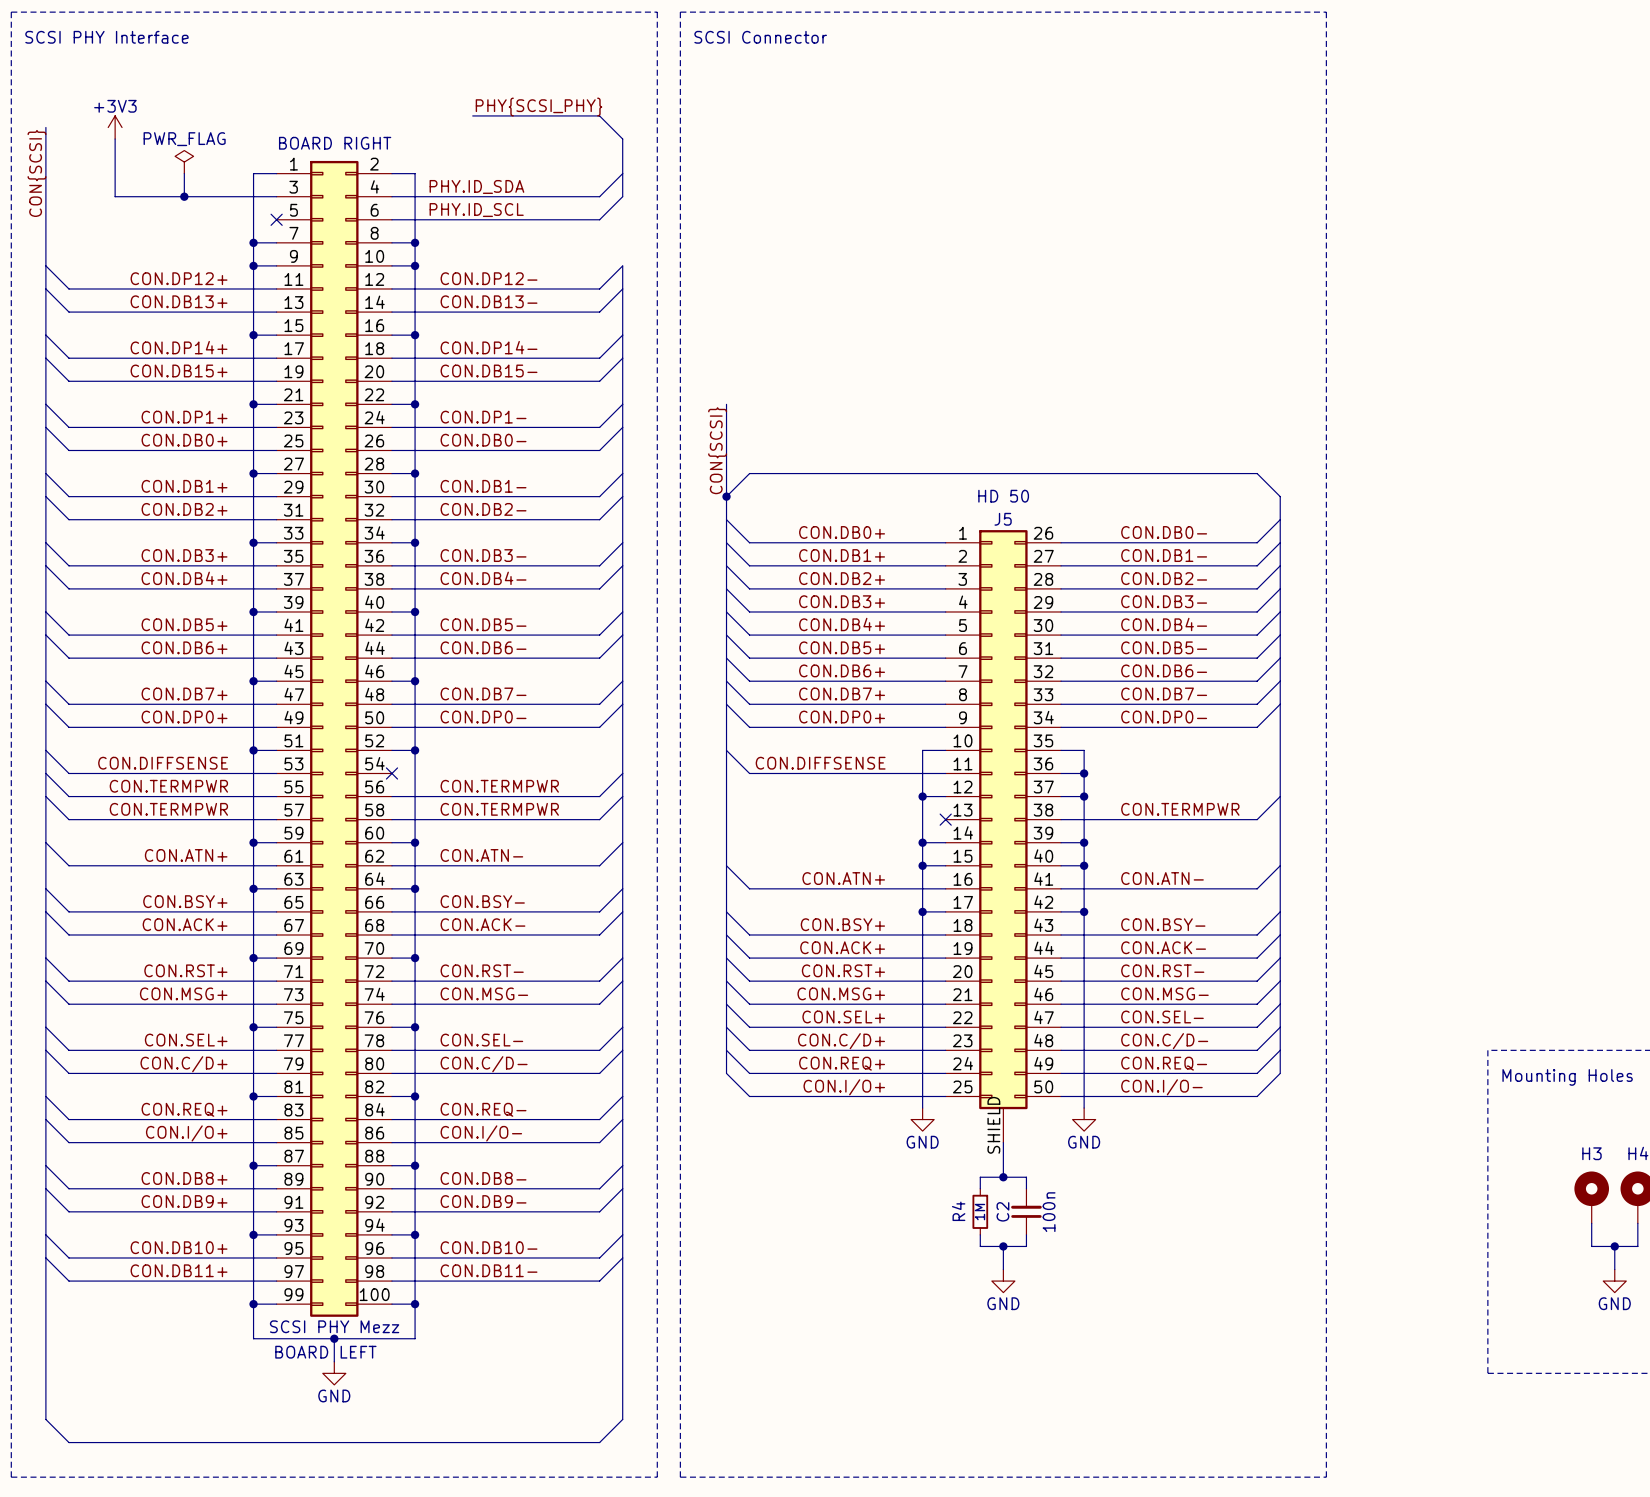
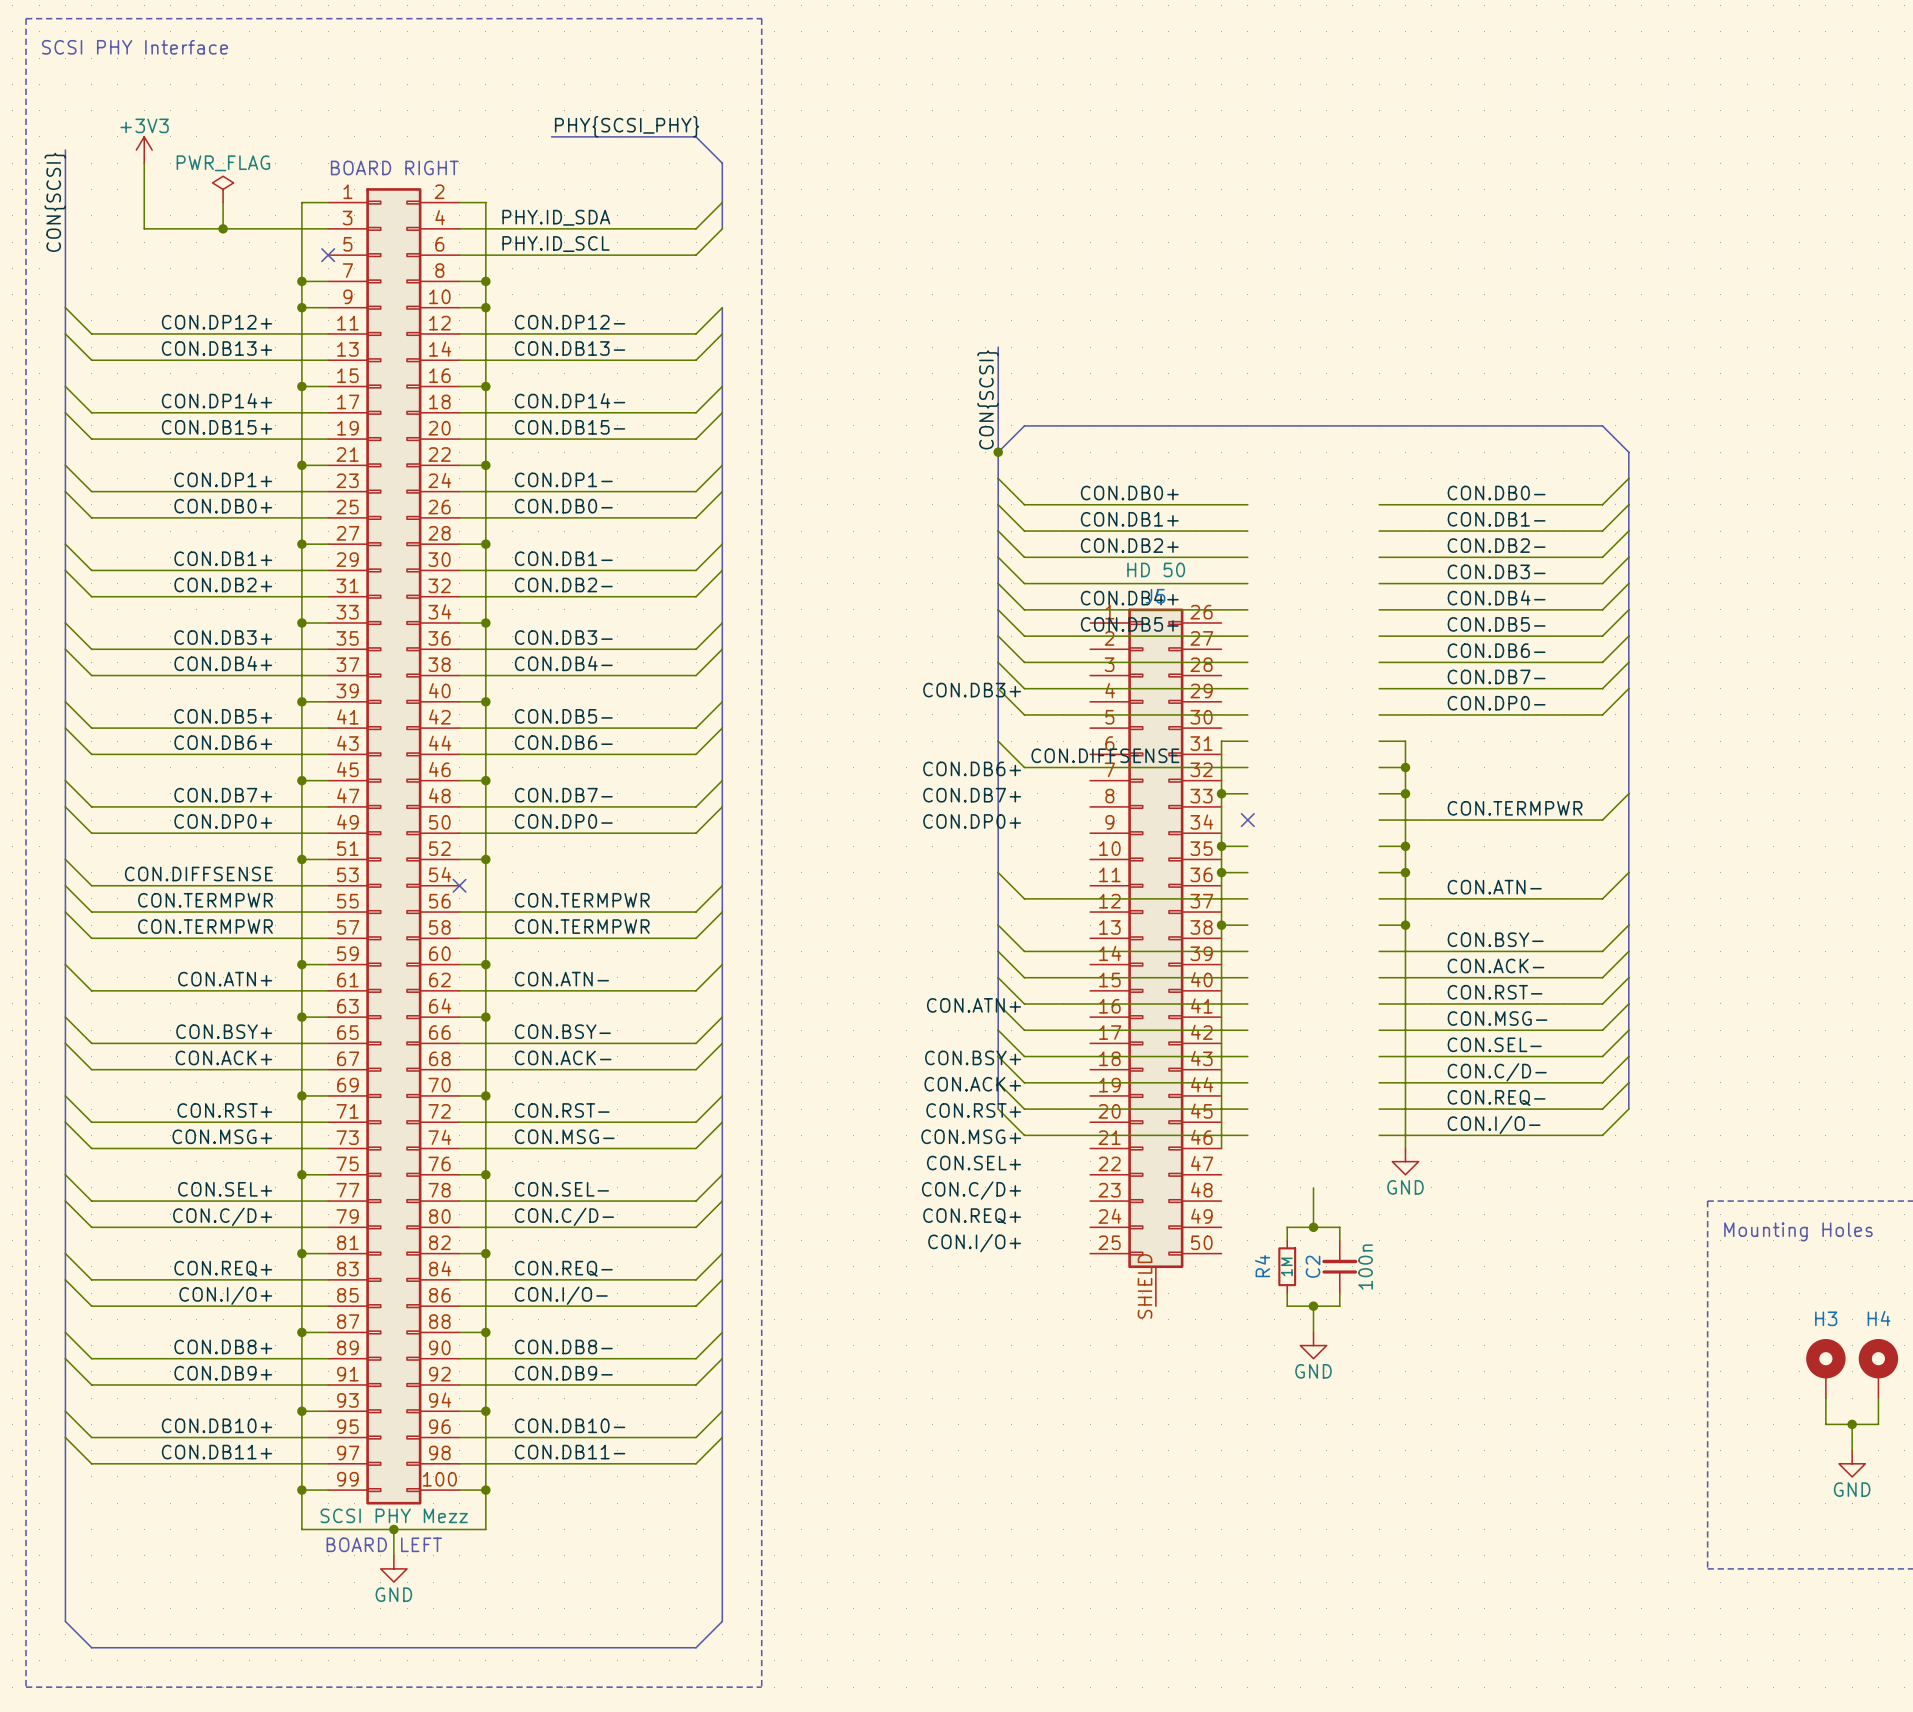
line: (680, 12) (680, 1477) (1326, 1477) (1326, 12) (680, 12) -> none
text: SCSI Connector (760, 37) -> none
junction: none -> (998, 452)
bus: (726, 404) (726, 1073) -> (998, 347) (998, 1109)
label position: CON{SCSI} (717, 450) -> CON{SCSI} (988, 399)
bus: (726, 496) (749, 473) (1257, 473) (1280, 496) (1280, 1073) -> (998, 452) (1024, 425) (1602, 425) (1628, 452) (1628, 1109)
junction: (726, 496) -> none
wire: (726, 519) (749, 542) (945, 542) -> (998, 478) (1024, 504) (1247, 504)
wire: (1280, 519) (1257, 542) (1061, 542) -> (1628, 478) (1602, 504) (1379, 504)
label position: CON.DB0+ (842, 532) -> CON.DB0+ (1129, 493)
label position: CON.DB0- (1164, 532) -> CON.DB0- (1496, 493)
wire: (726, 542) (749, 565) (945, 565) -> (998, 504) (1024, 531) (1247, 531)
wire: (1280, 542) (1257, 565) (1061, 565) -> (1628, 504) (1602, 531) (1379, 531)
label position: CON.DB1+ (842, 555) -> CON.DB1+ (1129, 519)
label position: CON.DB1- (1164, 555) -> CON.DB1- (1496, 519)
wire: (726, 565) (749, 588) (945, 588) -> (998, 531) (1024, 557) (1247, 557)
wire: (1280, 565) (1257, 588) (1061, 588) -> (1628, 531) (1602, 557) (1379, 557)
label position: CON.DB2+ (842, 578) -> CON.DB2+ (1129, 545)
label position: CON.DB2- (1164, 578) -> CON.DB2- (1496, 545)
wire: (726, 588) (749, 611) (945, 611) -> (998, 557) (1024, 583) (1247, 583)
wire: (1280, 588) (1257, 611) (1061, 611) -> (1628, 557) (1602, 583) (1379, 583)
label position: CON.DB3- (1164, 601) -> CON.DB3- (1496, 571)
wire: (726, 611) (749, 635) (945, 635) -> (998, 583) (1024, 609) (1247, 609)
wire: (1280, 611) (1257, 635) (1061, 635) -> (1628, 583) (1602, 609) (1379, 609)
label position: CON.DB4+ (842, 624) -> CON.DB4+ (1129, 597)
label position: CON.DB4- (1164, 624) -> CON.DB4- (1496, 597)
wire: (726, 635) (749, 658) (945, 658) -> (998, 609) (1024, 636) (1247, 636)
wire: (1280, 635) (1257, 658) (1061, 658) -> (1628, 609) (1602, 636) (1379, 636)
label position: CON.DB5+ (842, 647) -> CON.DB5+ (1129, 624)
label position: CON.DB5- (1164, 647) -> CON.DB5- (1496, 624)
wire: (726, 658) (749, 681) (945, 681) -> (998, 636) (1024, 662) (1247, 662)
wire: (1280, 658) (1257, 681) (1061, 681) -> (1628, 636) (1602, 662) (1379, 662)
junction: none -> (1405, 767)
label position: CON.DB6- (1164, 670) -> CON.DB6- (1496, 650)
wire: (726, 681) (749, 704) (945, 704) -> (998, 662) (1024, 688) (1247, 688)
wire: (1280, 681) (1257, 704) (1061, 704) -> (1628, 662) (1602, 688) (1379, 688)
junction: none -> (1221, 793)
junction: none -> (1405, 793)
label position: CON.DB7- (1164, 693) -> CON.DB7- (1496, 676)
wire: (726, 704) (749, 727) (945, 727) -> (998, 688) (1024, 714) (1247, 714)
wire: (1280, 704) (1257, 727) (1061, 727) -> (1628, 688) (1602, 714) (1379, 714)
no-connect mark: none -> (1247, 820)
label position: CON.DP0- (1164, 717) -> CON.DP0- (1496, 703)
junction: none -> (1221, 846)
junction: none -> (1405, 846)
wire: (726, 750) (749, 773) (945, 773) -> (998, 741) (1024, 767) (1247, 767)
wire: (945, 750) (922, 750) (922, 1108) -> none
wire: (1061, 750) (1084, 750) (1084, 1108) -> (1379, 741) (1405, 741) (1405, 1148)
junction: none -> (1221, 872)
junction: none -> (1405, 872)
label position: CON.DIFFSENSE (820, 763) -> CON.DIFFSENSE (1105, 755)
wire: (1061, 773) (1084, 773) -> (1379, 767) (1405, 767)
junction: (1084, 773) -> none
wire: (922, 796) (945, 796) -> (1221, 793) (1247, 793)
junction: (922, 796) -> none
wire: (1061, 796) (1084, 796) -> (1379, 793) (1405, 793)
junction: (1084, 796) -> none
wire: (1280, 796) (1257, 819) (1061, 819) -> (1628, 793) (1602, 820) (1379, 820)
junction: none -> (1221, 925)
junction: none -> (1405, 925)
label position: CON.TERMPWR (1180, 809) -> CON.TERMPWR (1515, 808)
no-connect mark: (945, 819) -> none
wire: (922, 842) (945, 842) -> (1221, 846) (1247, 846)
junction: (922, 842) -> none
wire: (1061, 842) (1084, 842) -> (1379, 846) (1405, 846)
junction: (1084, 842) -> none
wire: (726, 865) (749, 888) (945, 888) -> (998, 872) (1024, 898) (1247, 898)
wire: (922, 865) (945, 865) -> (1221, 872) (1247, 872)
junction: (922, 865) -> none
wire: (1061, 865) (1084, 865) -> (1379, 872) (1405, 872)
junction: (1084, 865) -> none
wire: (1280, 865) (1257, 888) (1061, 888) -> (1628, 872) (1602, 898) (1379, 898)
wire: none -> (1628, 1003) (1602, 1030) (1379, 1030)
label position: CON.ATN- (1162, 878) -> CON.ATN- (1494, 887)
wire: (726, 911) (749, 934) (945, 934) -> (998, 925) (1024, 951) (1247, 951)
wire: (922, 911) (945, 911) -> (1221, 925) (1247, 925)
junction: (922, 911) -> none
wire: (1061, 911) (1084, 911) -> (1379, 925) (1405, 925)
junction: (1084, 911) -> none
wire: (1280, 911) (1257, 934) (1061, 934) -> (1628, 925) (1602, 951) (1379, 951)
label position: CON.BSY- (1163, 924) -> CON.BSY- (1495, 939)
wire: (726, 934) (749, 958) (945, 958) -> (998, 951) (1024, 977) (1247, 977)
wire: (1280, 934) (1257, 958) (1061, 958) -> (1628, 951) (1602, 977) (1379, 977)
wire: none -> (1628, 1082) (1602, 1109) (1379, 1109)
label position: CON.ACK- (1163, 947) -> CON.ACK- (1495, 965)
wire: (726, 958) (749, 981) (945, 981) -> (998, 977) (1024, 1003) (1247, 1003)
wire: (1280, 958) (1257, 981) (1061, 981) -> (1628, 977) (1602, 1003) (1379, 1003)
label position: CON.RST- (1162, 970) -> CON.RST- (1495, 992)
wire: (726, 981) (749, 1004) (945, 1004) -> (998, 1003) (1024, 1030) (1247, 1030)
wire: (1280, 981) (1257, 1004) (1061, 1004) -> (1247, 741) (1221, 741) (1221, 1148)
label position: CON.MSG- (1164, 993) -> CON.MSG- (1497, 1018)
wire: (726, 1004) (749, 1027) (945, 1027) -> (998, 1030) (1024, 1056) (1247, 1056)
wire: (1280, 1004) (1257, 1027) (1061, 1027) -> (1628, 1030) (1602, 1056) (1379, 1056)
power symbol: none -> GND (1405, 1161)
label position: CON.SEL- (1162, 1016) -> CON.SEL- (1494, 1044)
wire: (726, 1027) (749, 1050) (945, 1050) -> (998, 1056) (1024, 1082) (1247, 1082)
wire: (1280, 1027) (1257, 1050) (1061, 1050) -> (1628, 1056) (1602, 1082) (1379, 1082)
label position: CON.C/D- (1164, 1041) -> CON.C/D- (1497, 1072)
wire: (726, 1050) (749, 1073) (945, 1073) -> (998, 1082) (1024, 1109) (1247, 1109)
wire: (1280, 1050) (1257, 1073) (1164, 1073) -> (1339, 1240) (1339, 1227)
label position: CON.REQ- (1164, 1063) -> CON.REQ- (1496, 1097)
wire: (726, 1073) (749, 1096) (945, 1096) -> (998, 1109) (1024, 1135) (1247, 1135)
wire: (1061, 1073) (1118, 1073) -> (1287, 1240) (1287, 1227)
junction: none -> (1313, 1227)
wire: (1280, 1073) (1257, 1096) (1061, 1096) -> (1628, 1109) (1602, 1135) (1379, 1135)
label position: CON.I/O- (1161, 1087) -> CON.I/O- (1494, 1124)
power symbol: GND (922, 1119) -> none
power symbol position: GND (1084, 1119) -> GND (1313, 1345)
wire: (1003, 1142) (1003, 1177) -> (1313, 1187) (1313, 1227)
junction: none -> (1313, 1306)
junction: (1003, 1177) -> none
wire: (980, 1188) (980, 1177) (1026, 1177) (1026, 1188) -> none
R4 position: (980, 1211) -> (1287, 1266)
C2 position: (1026, 1211) -> (1339, 1266)
wire: (980, 1234) (980, 1246) (1026, 1246) (1026, 1234) -> (1287, 1293) (1287, 1306) (1339, 1306) (1339, 1293)
wire: (1003, 1246) (1003, 1269) -> (1313, 1306) (1313, 1332)
junction: (1003, 1246) -> none
power symbol: GND (1003, 1281) -> none

